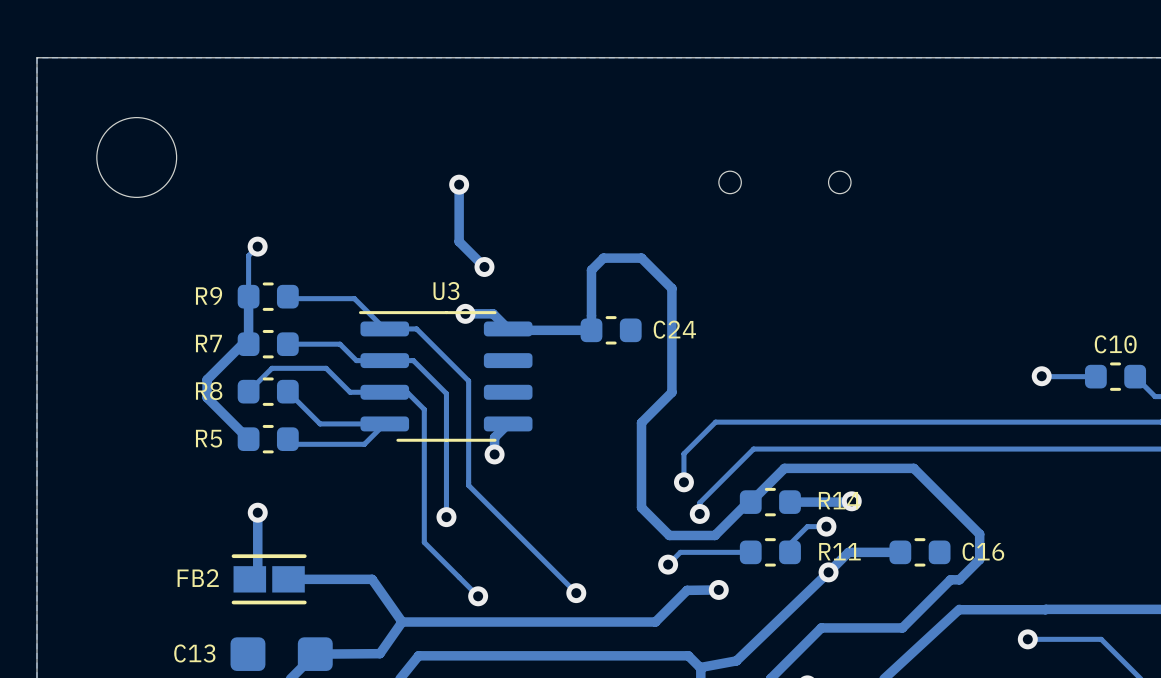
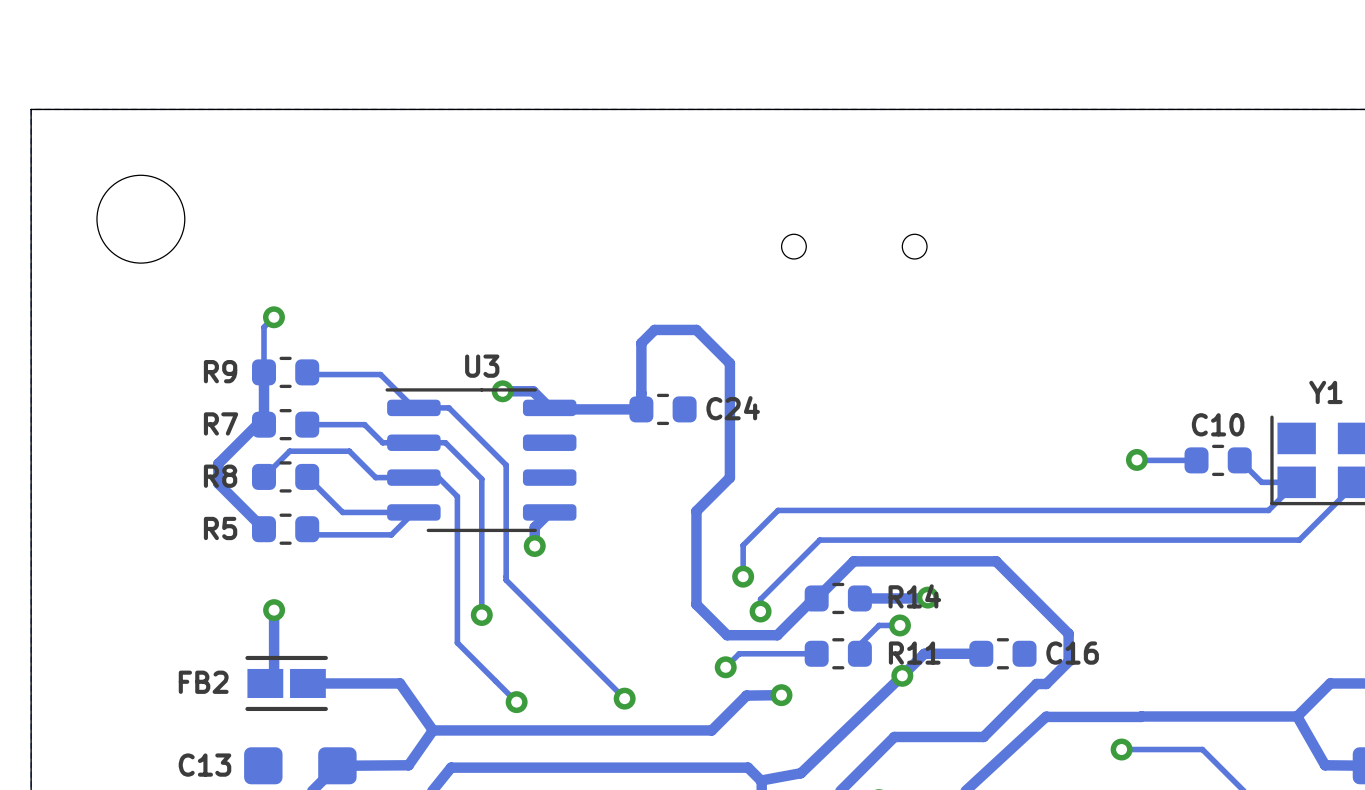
track: (459, 184) (459, 241) (484, 266) -> none
via: (459, 184) -> none
via: (484, 266) -> none

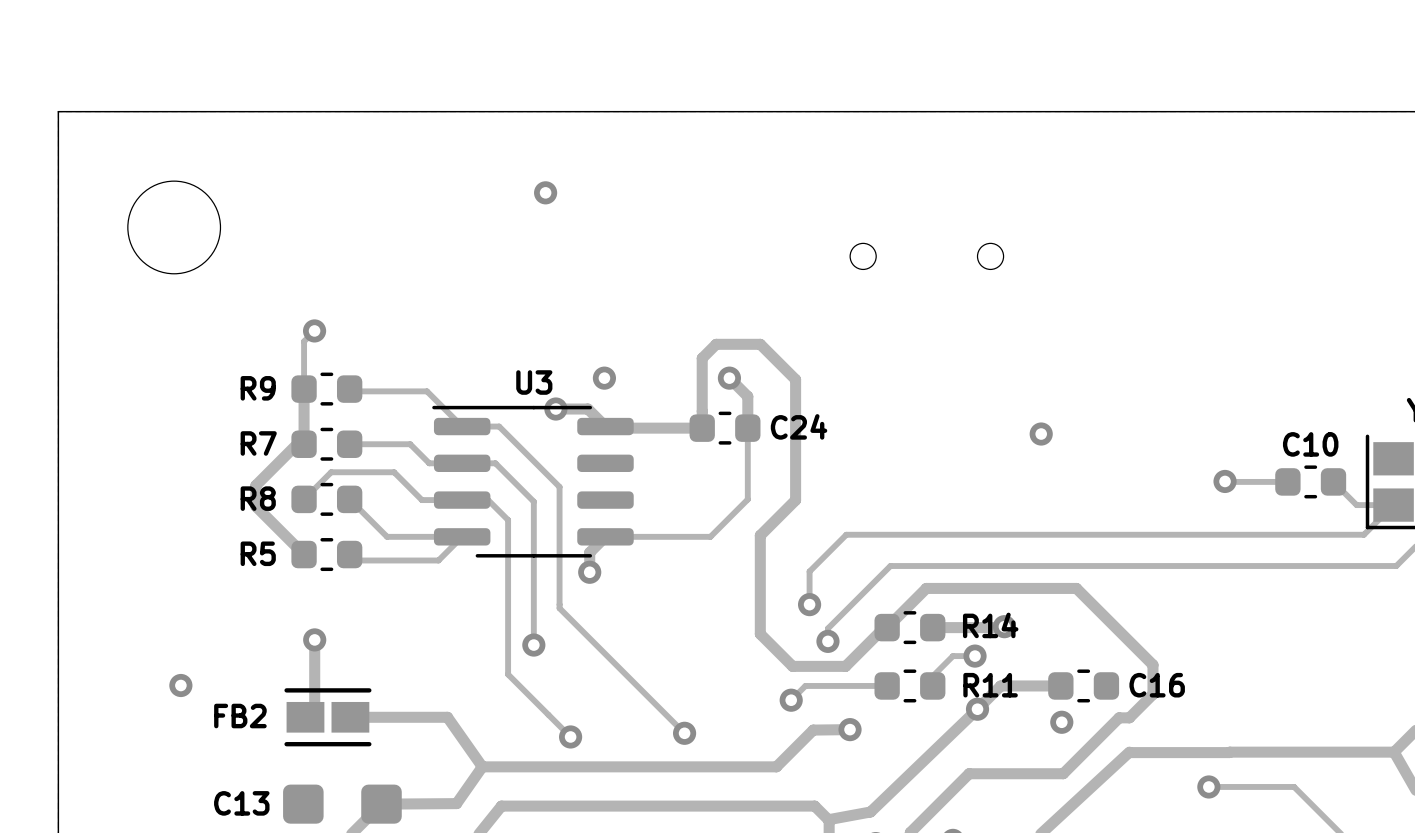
via: none -> (545, 192)
via: none -> (604, 378)
track: none -> (729, 378) (747, 396) (747, 499) (710, 536) (605, 536)
via: none -> (729, 378)
via: none -> (1041, 434)
via: none -> (180, 685)
via: none -> (1061, 722)

